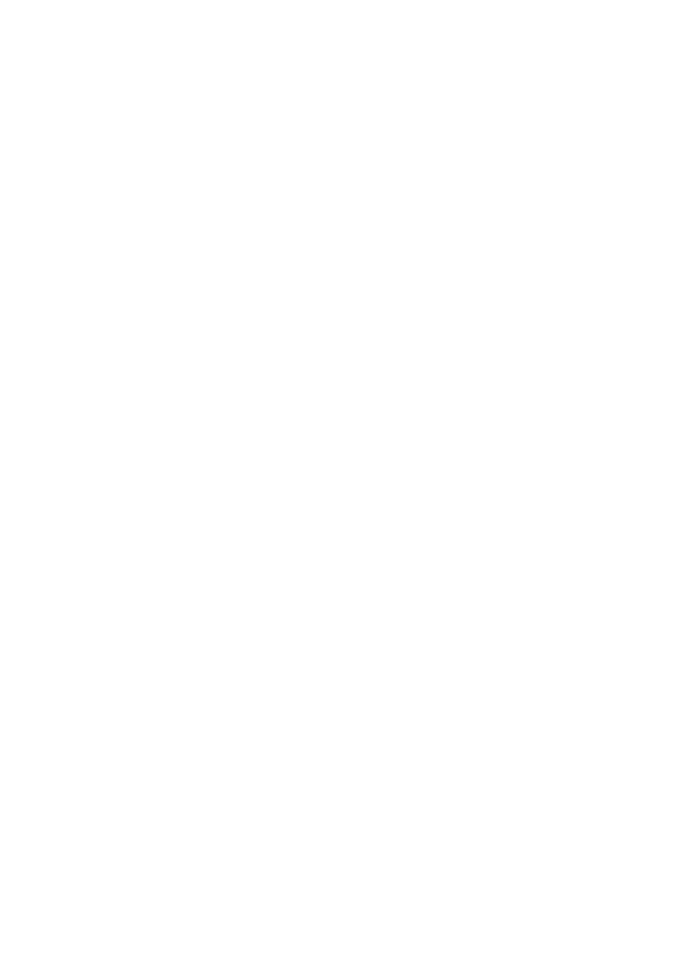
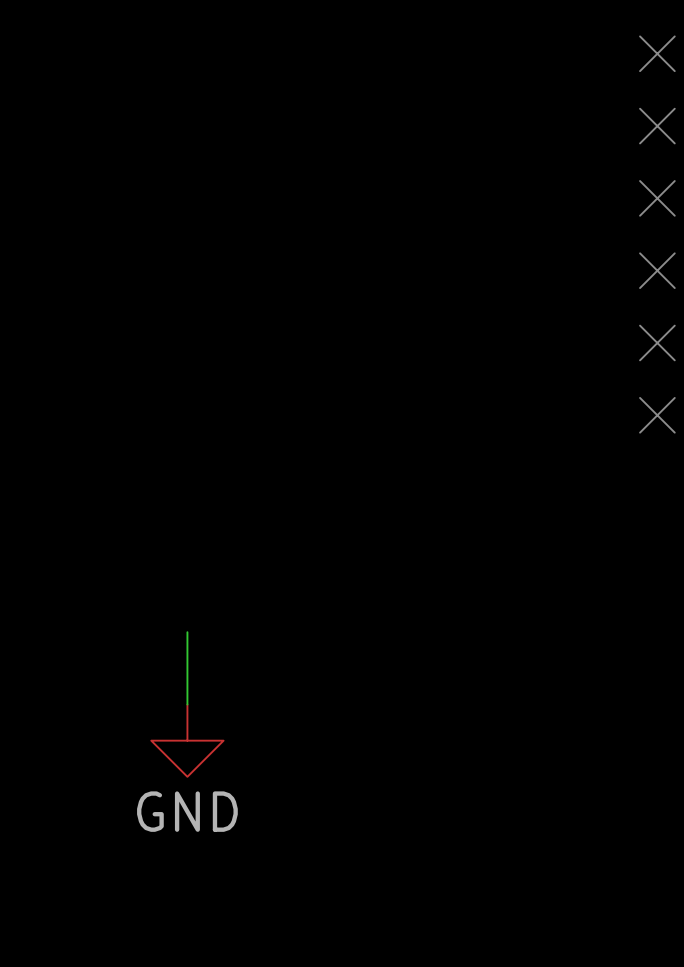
no-connect mark: none -> (657, 53)
no-connect mark: none -> (657, 126)
no-connect mark: none -> (657, 198)
no-connect mark: none -> (657, 270)
no-connect mark: none -> (657, 342)
no-connect mark: none -> (657, 415)
wire: none -> (187, 632) (187, 704)
power symbol: none -> GND (187, 740)

